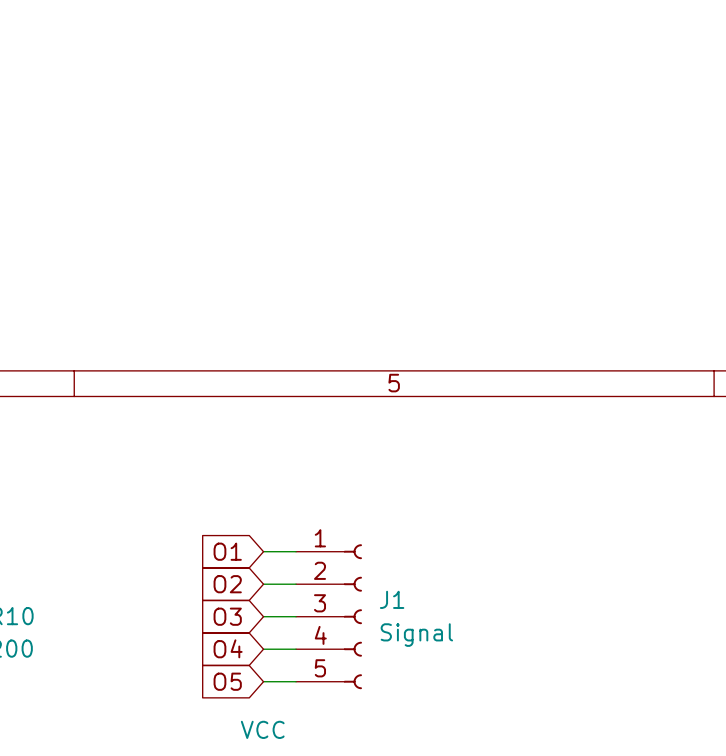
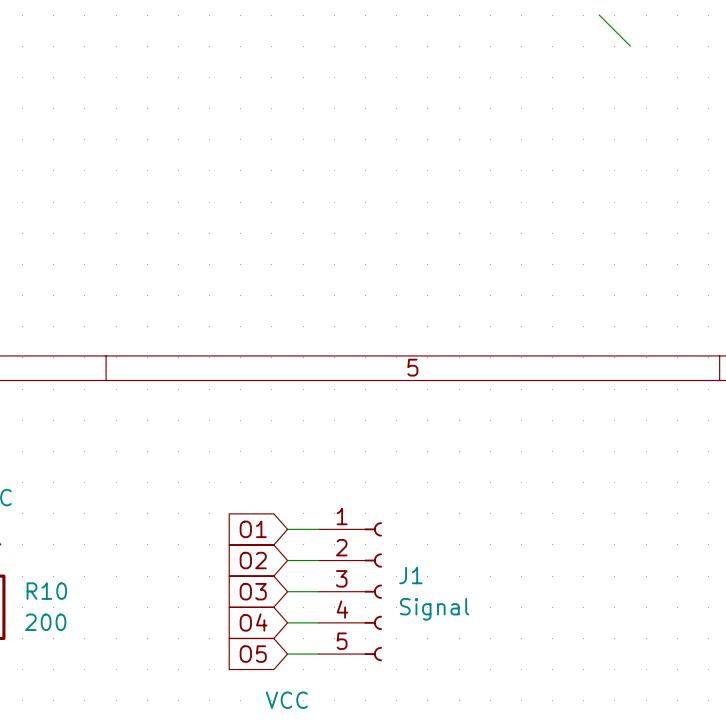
wire: none -> (599, 15) (630, 46)

